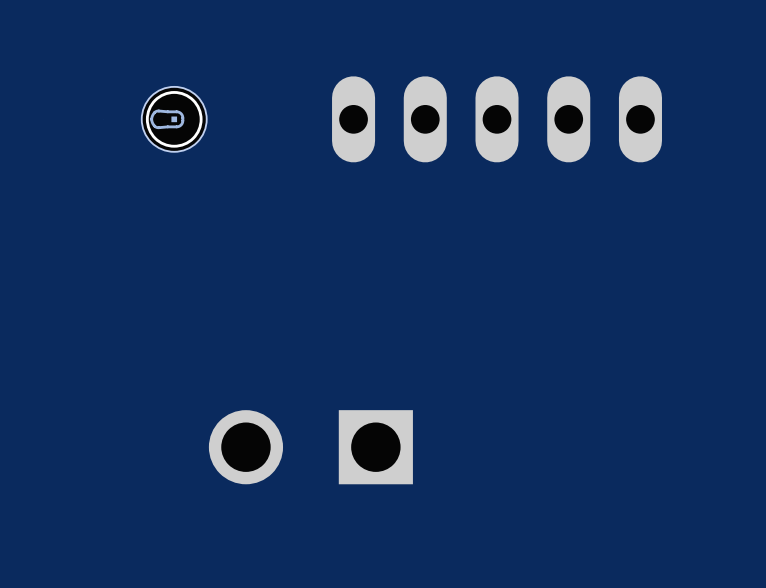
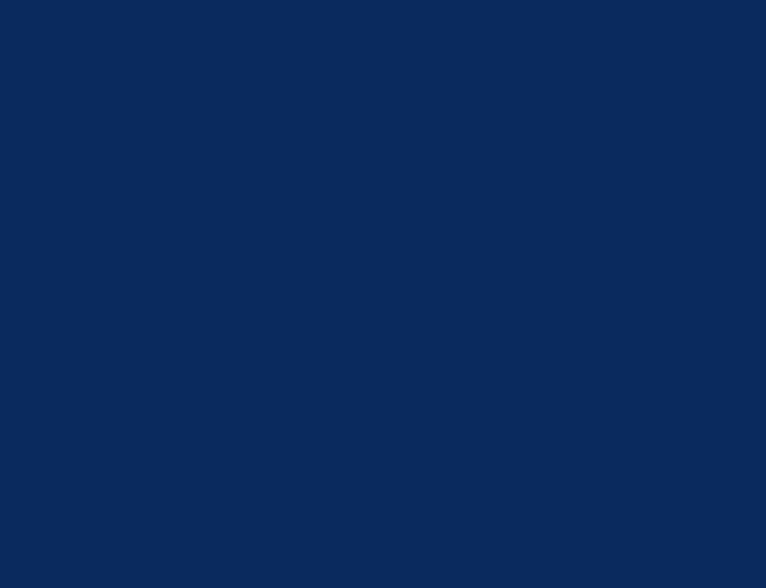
part: (181, 119) -> none
part: (497, 119) -> none
part: (310, 447) -> none

